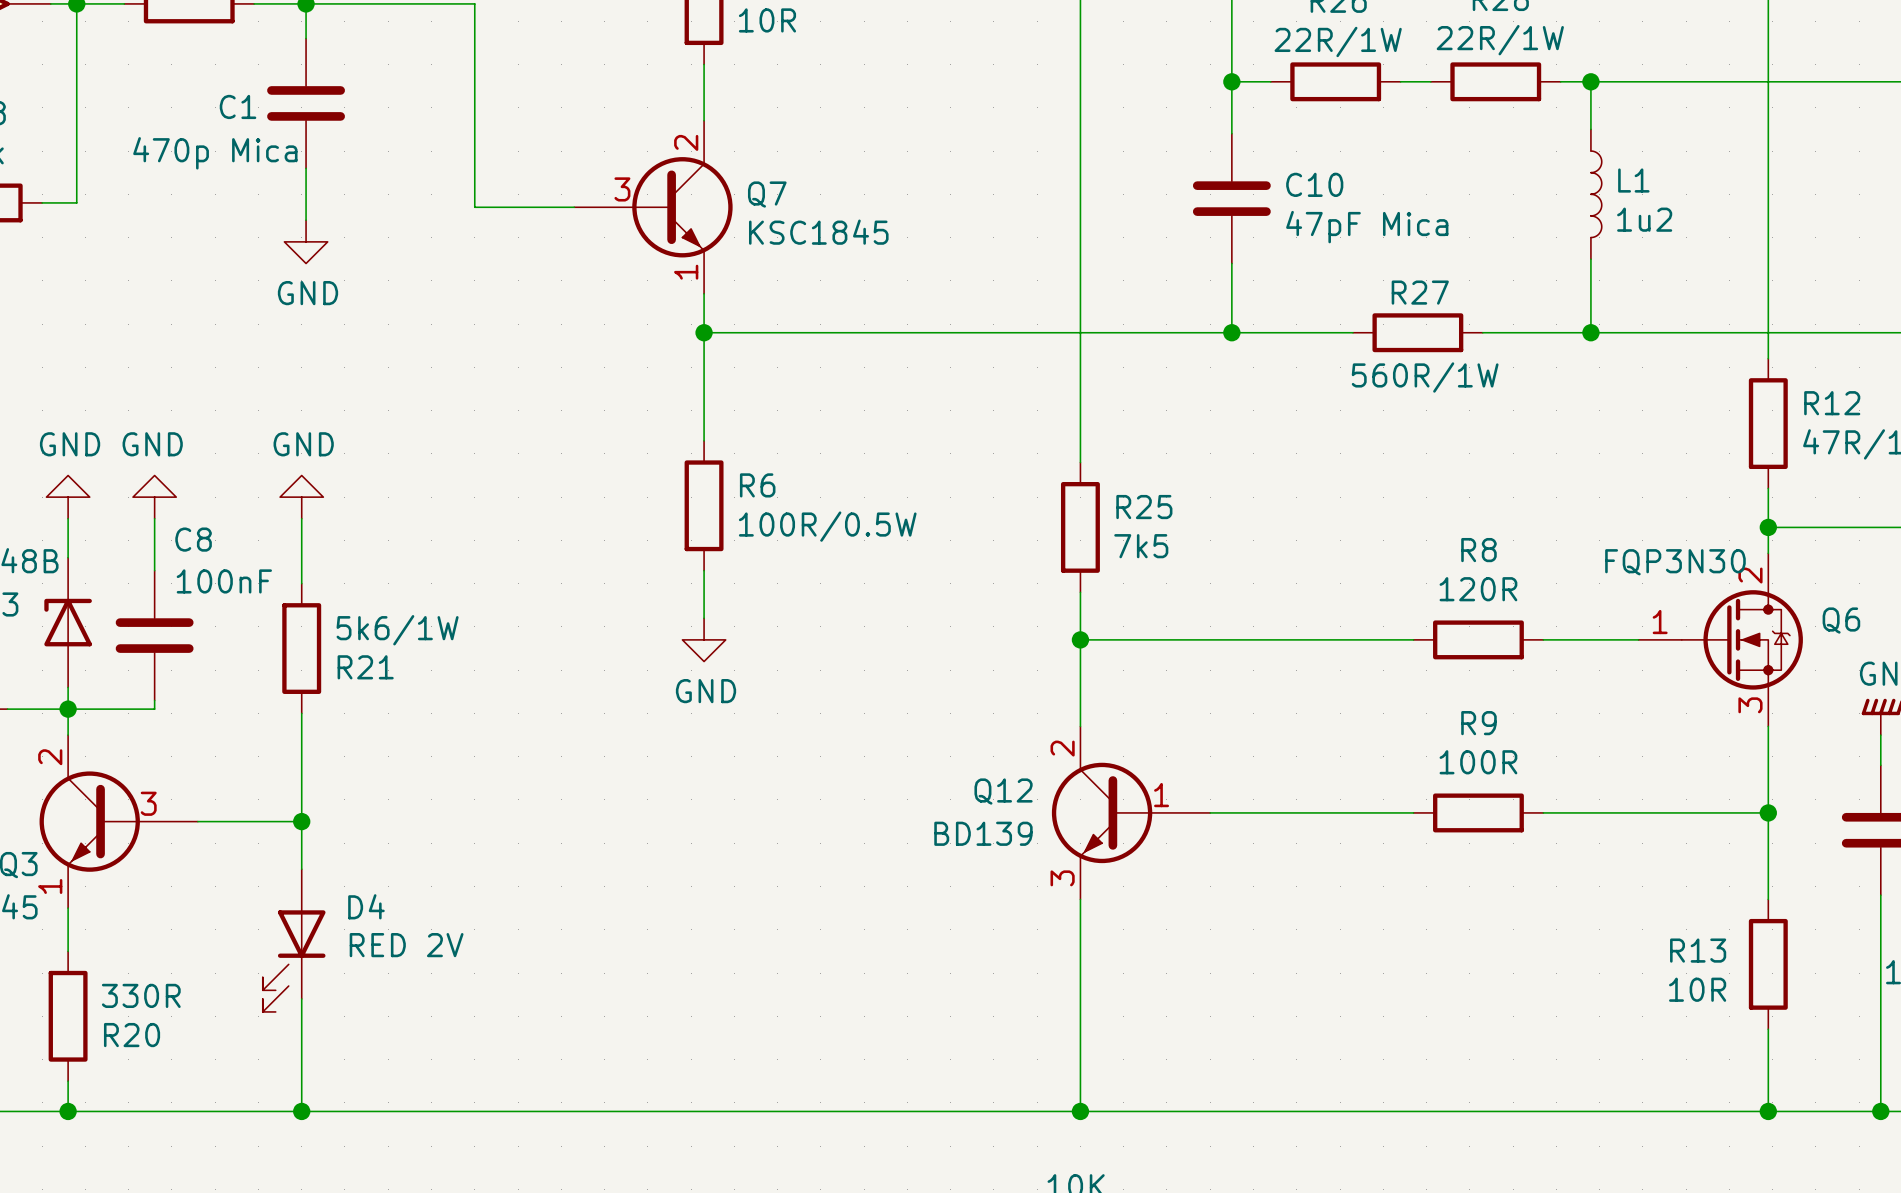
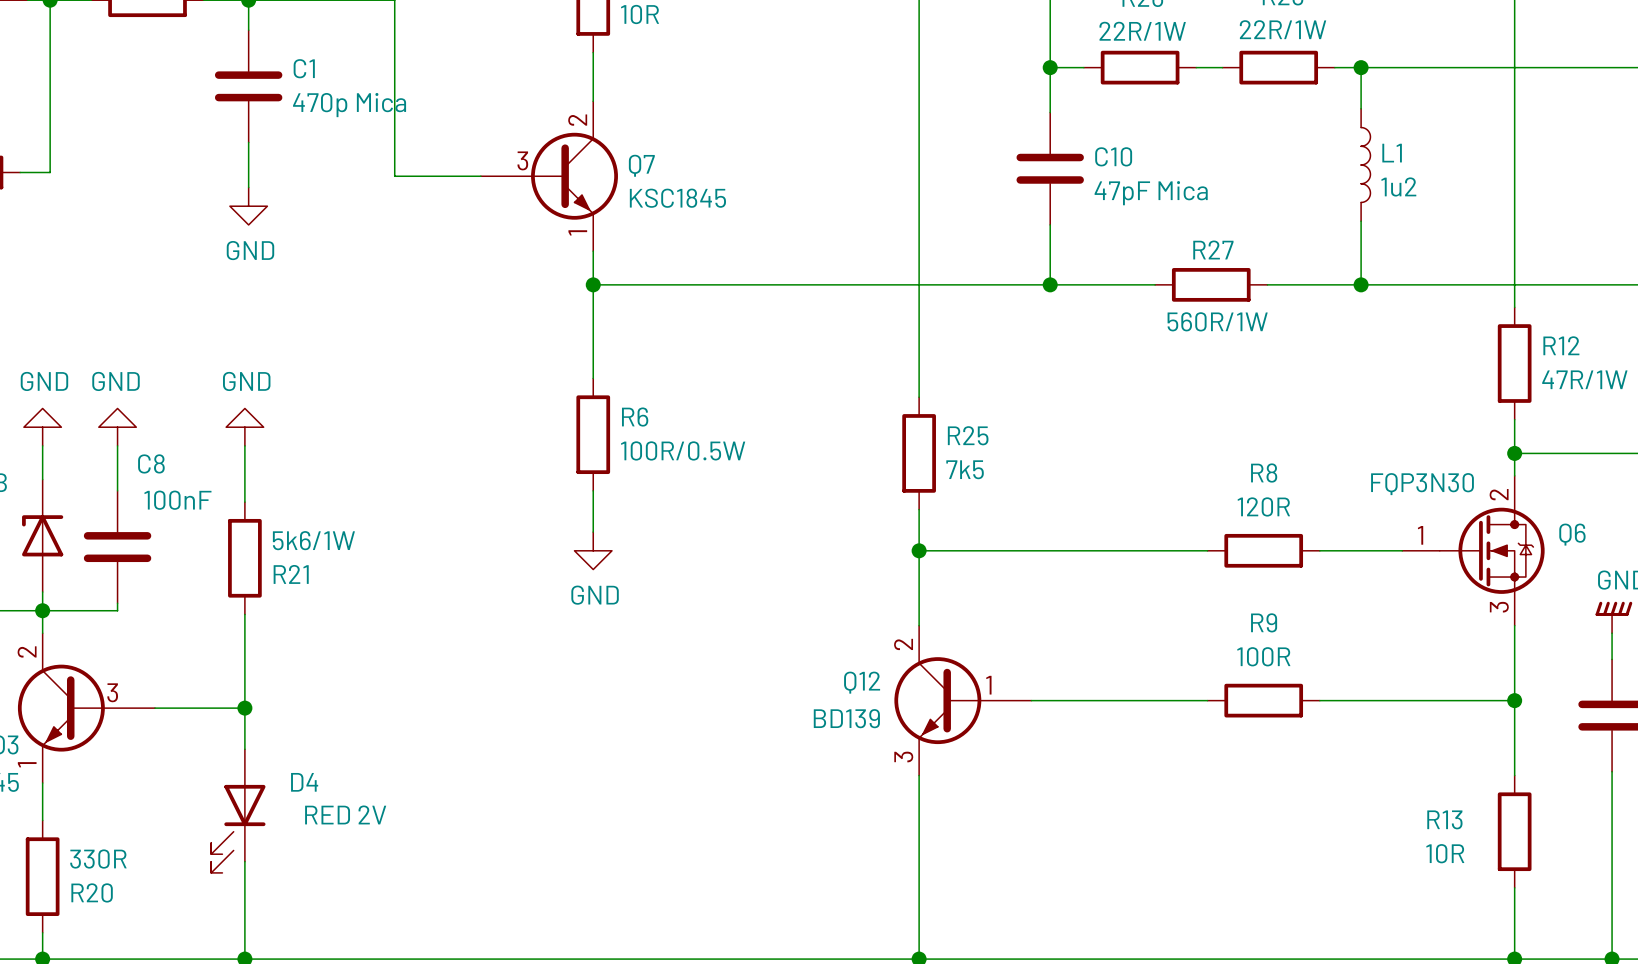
C1 name position: C1 (238, 106) -> C1 (304, 68)
C1 value position: 470p Mica (215, 153) -> 470p Mica (349, 105)

